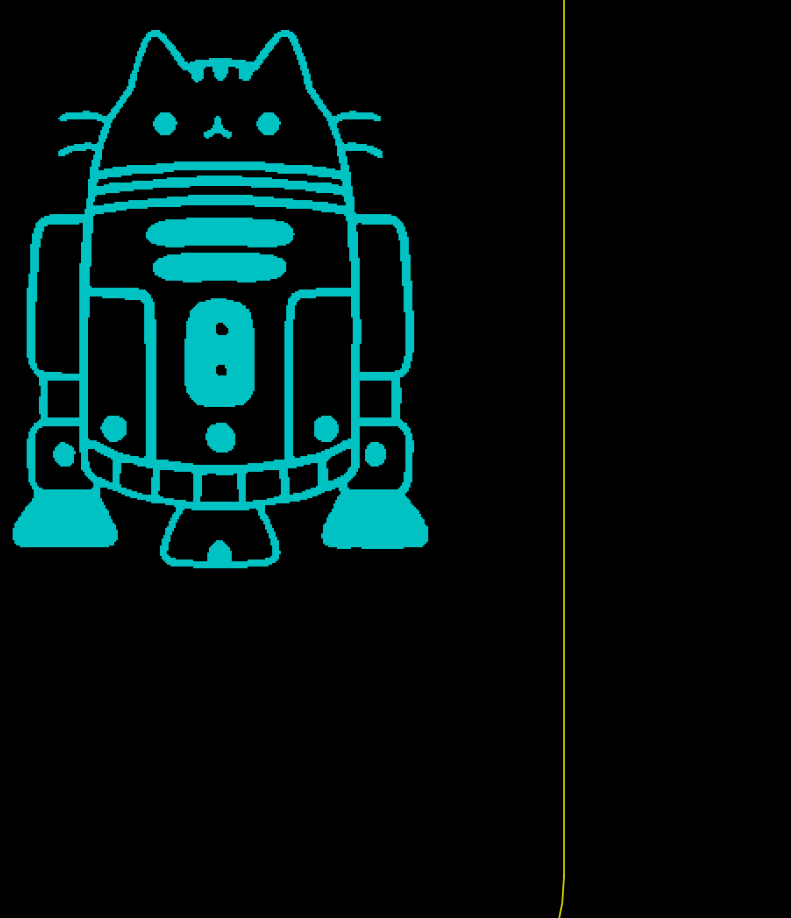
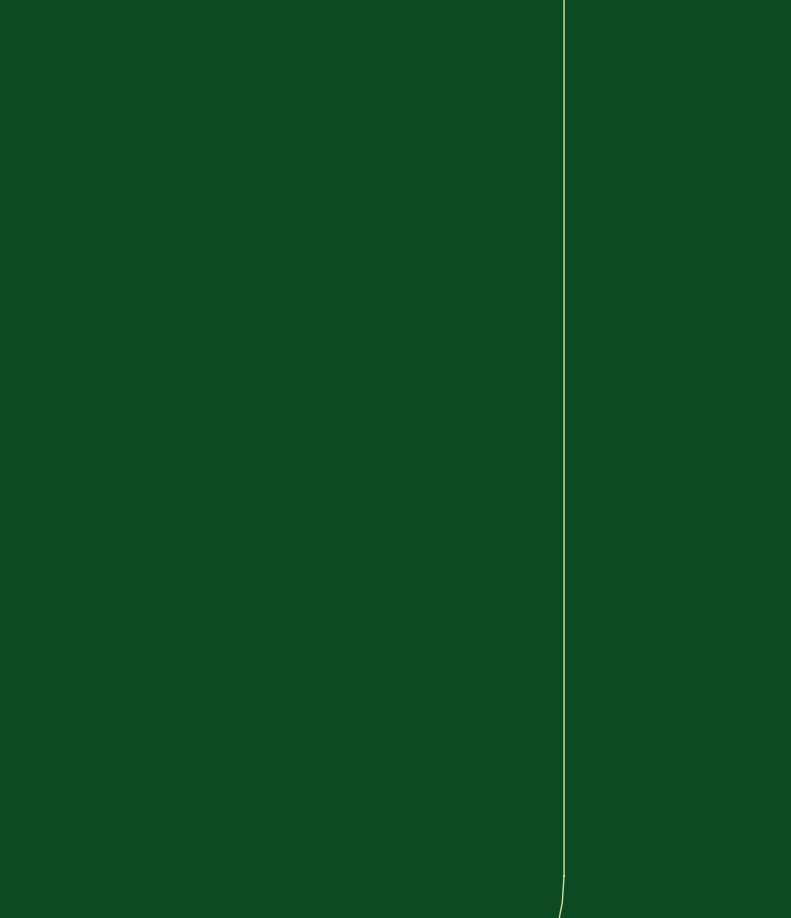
drawing: [12, 29, 429, 569] -> none

